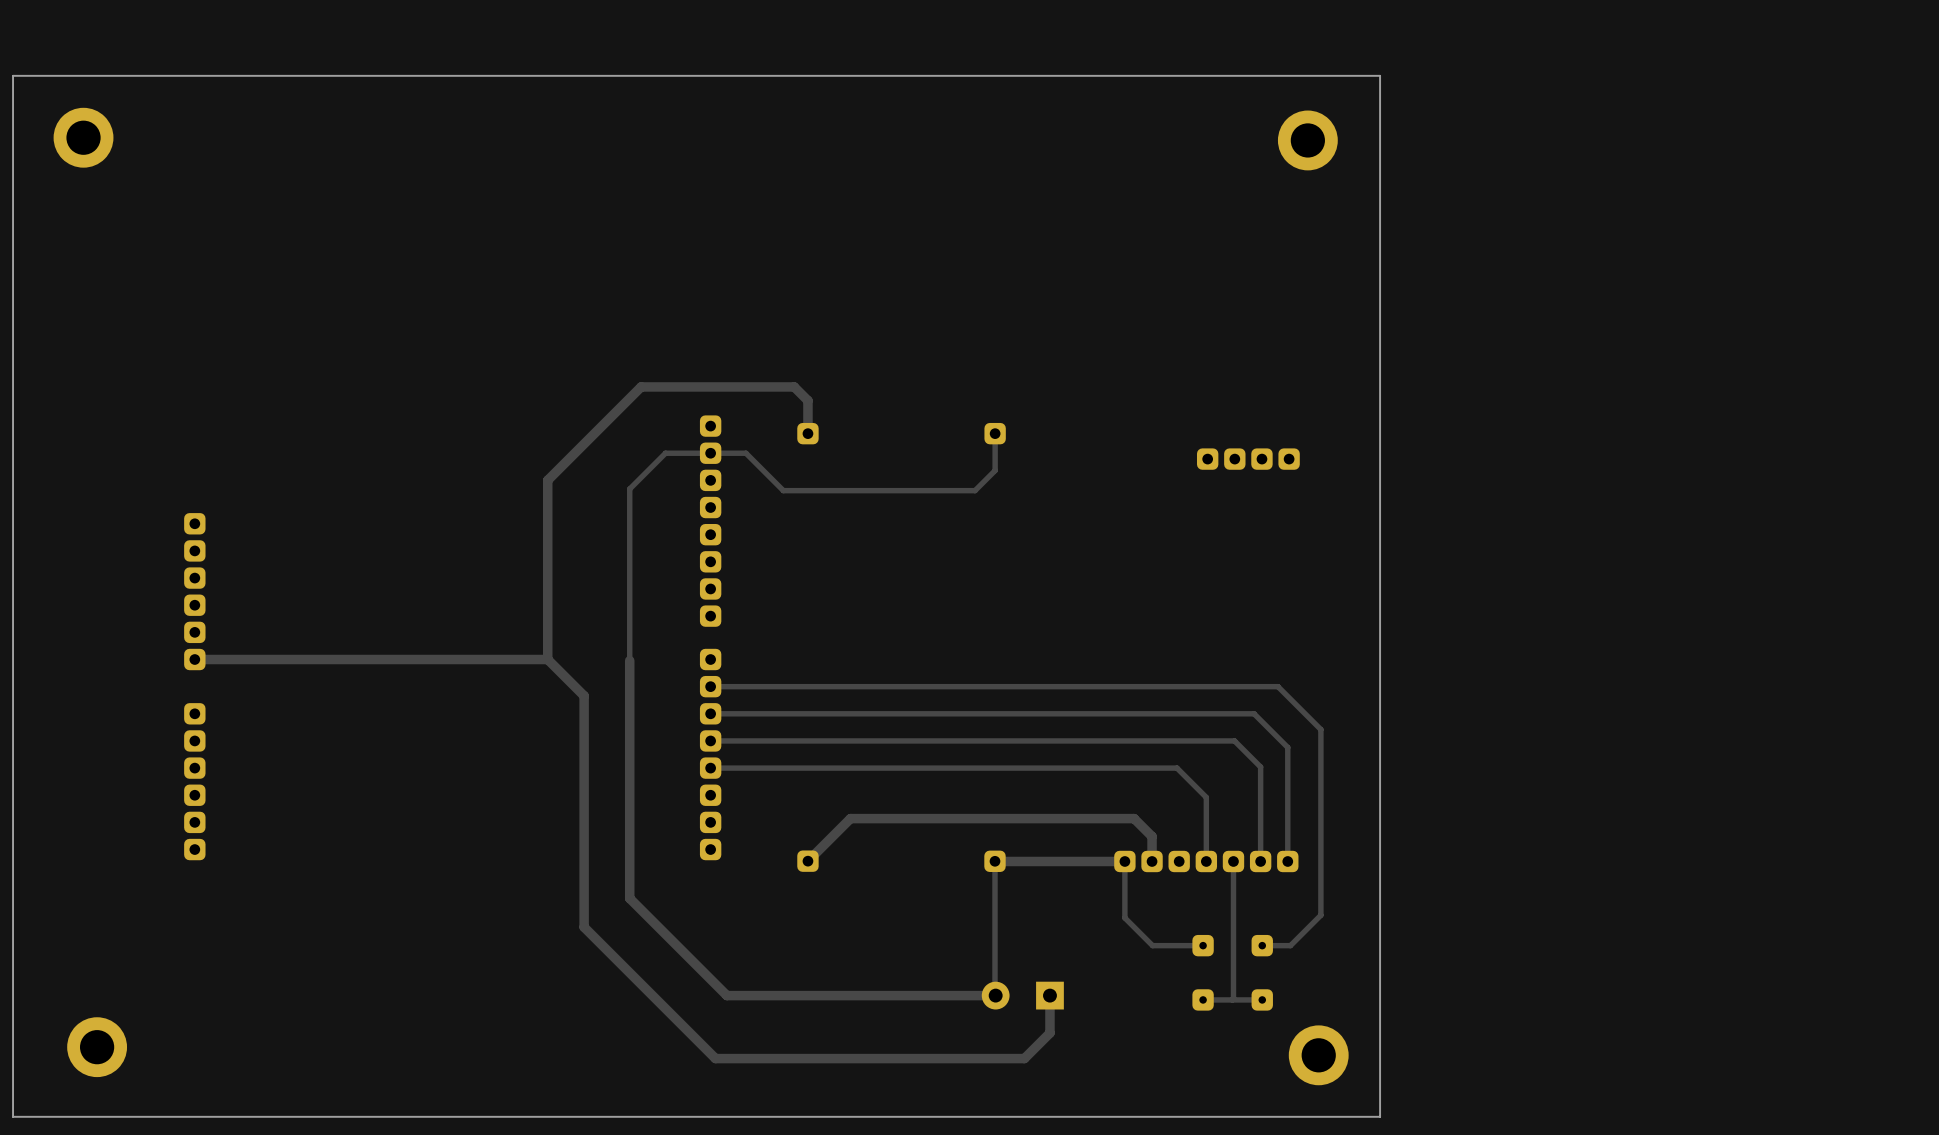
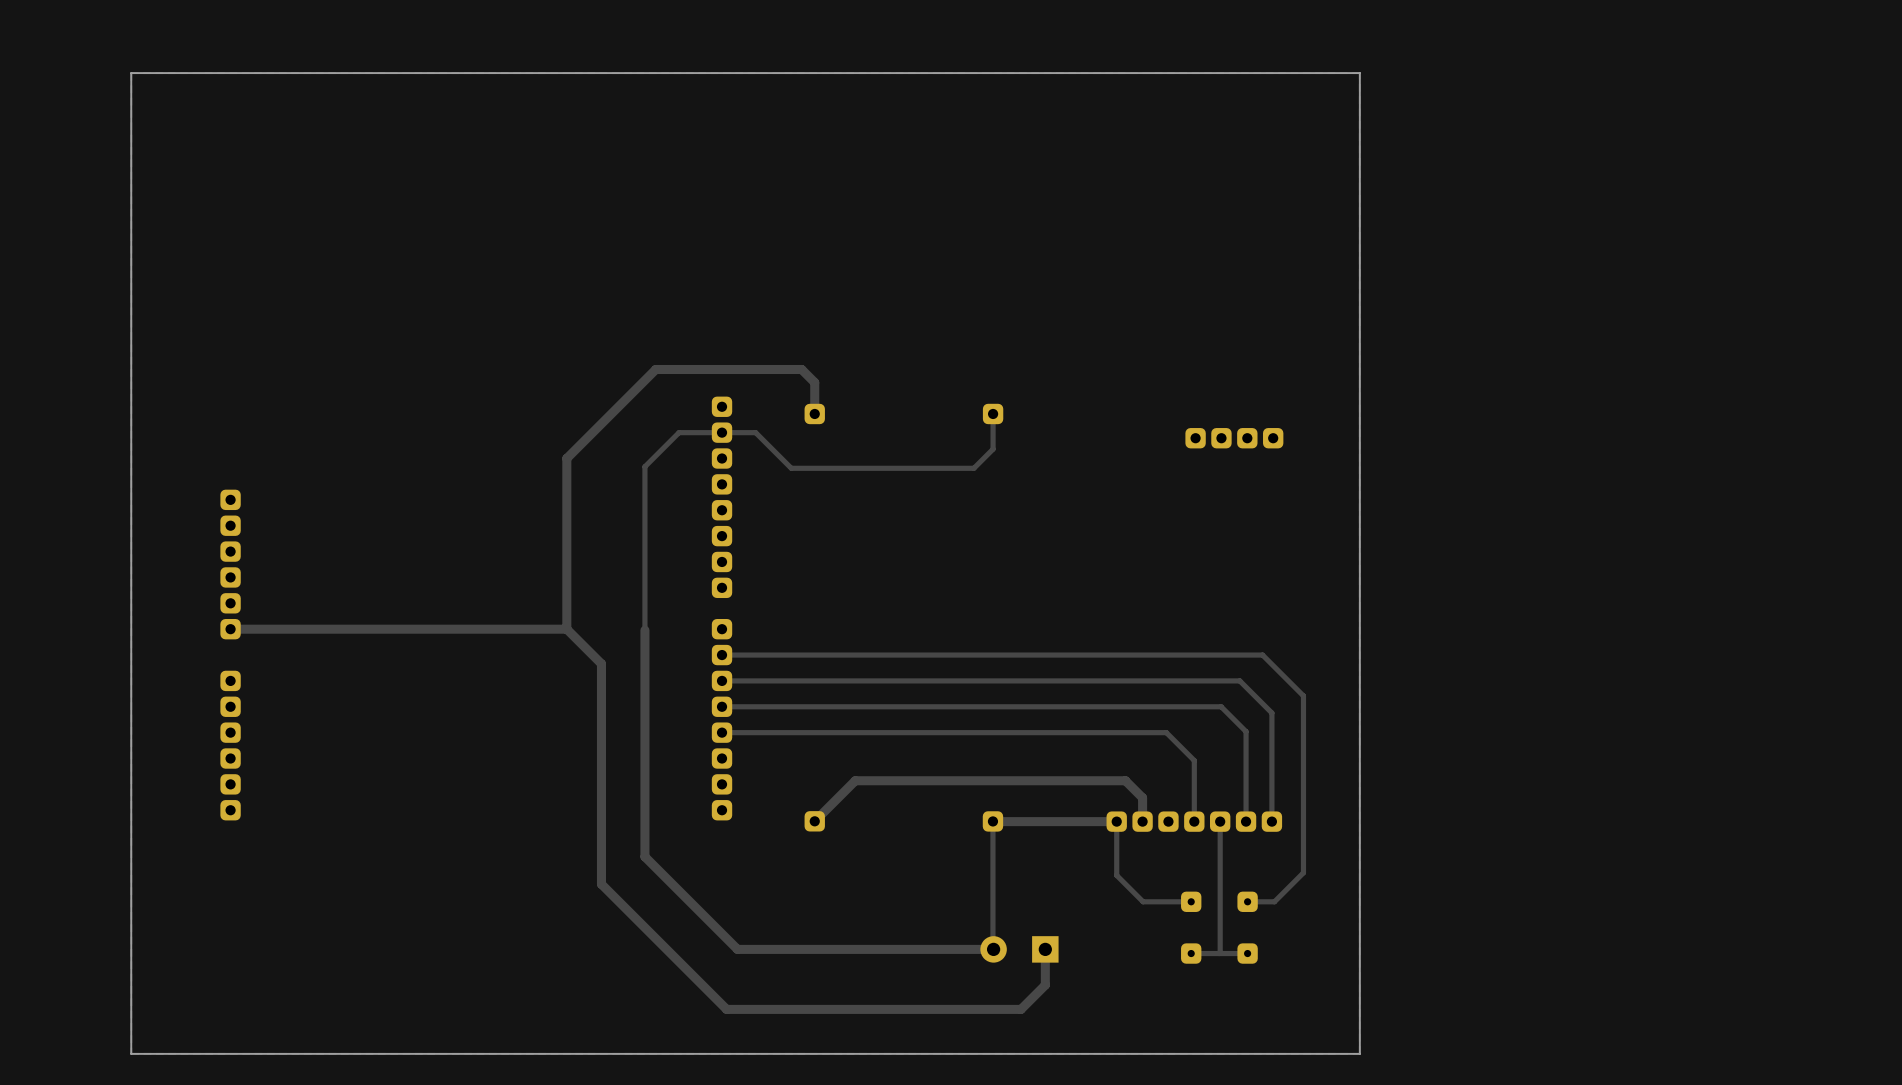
board edge: (90, 75) (13, 75) (13, 1116) (1380, 1116) (1380, 1105) -> (131, 73) (131, 1053) (1359, 1053)
part: (83, 137) -> none
part: (1307, 140) -> none
part: (97, 1047) -> none
part: (1318, 1055) -> none

